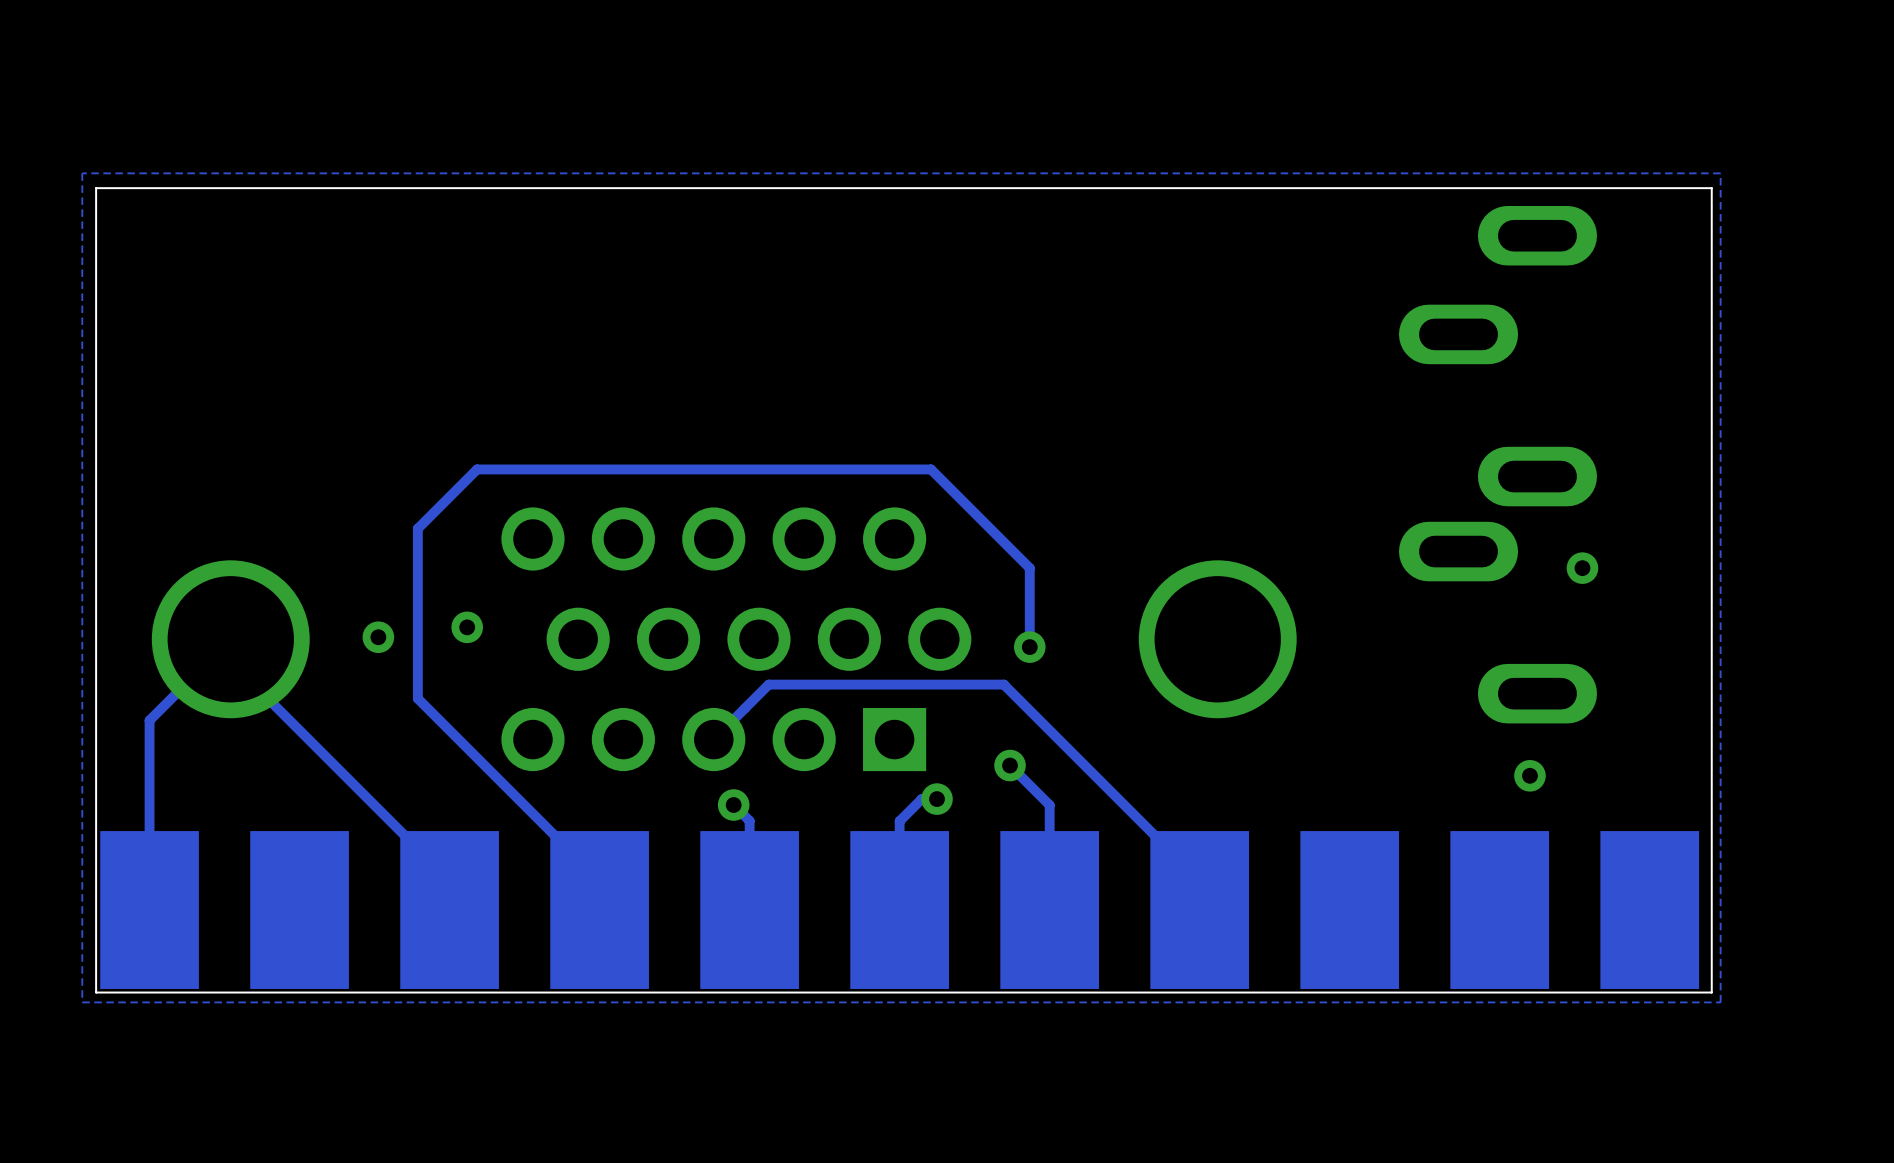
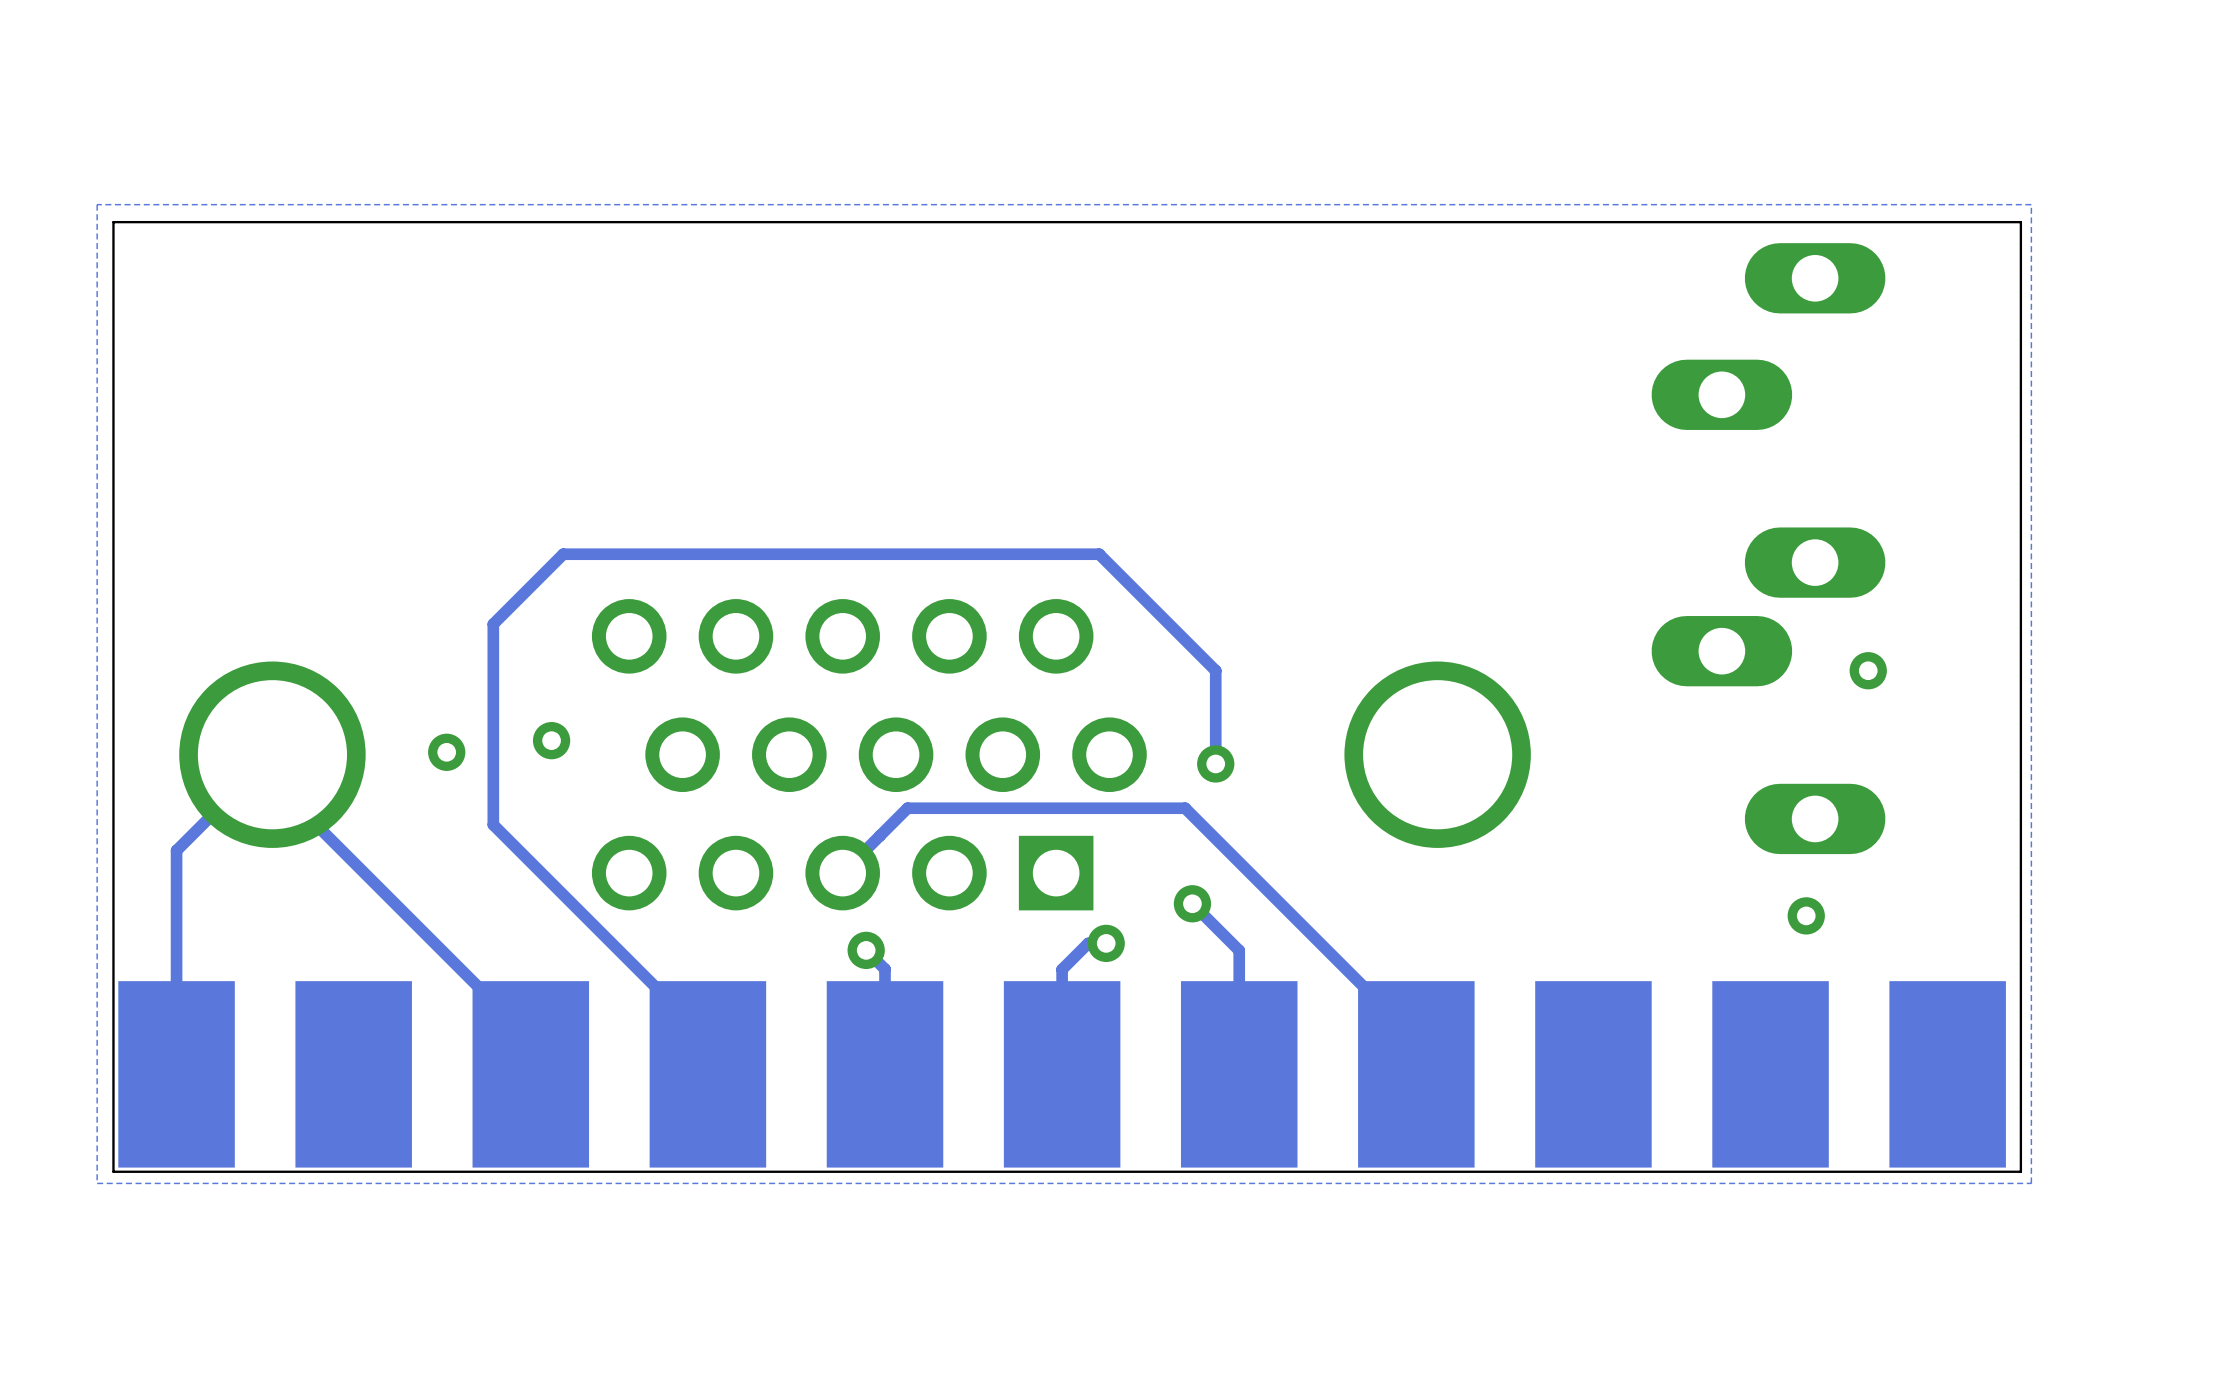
part footprint: [1398, 205, 1598, 724] -> [1651, 243, 1886, 855]

